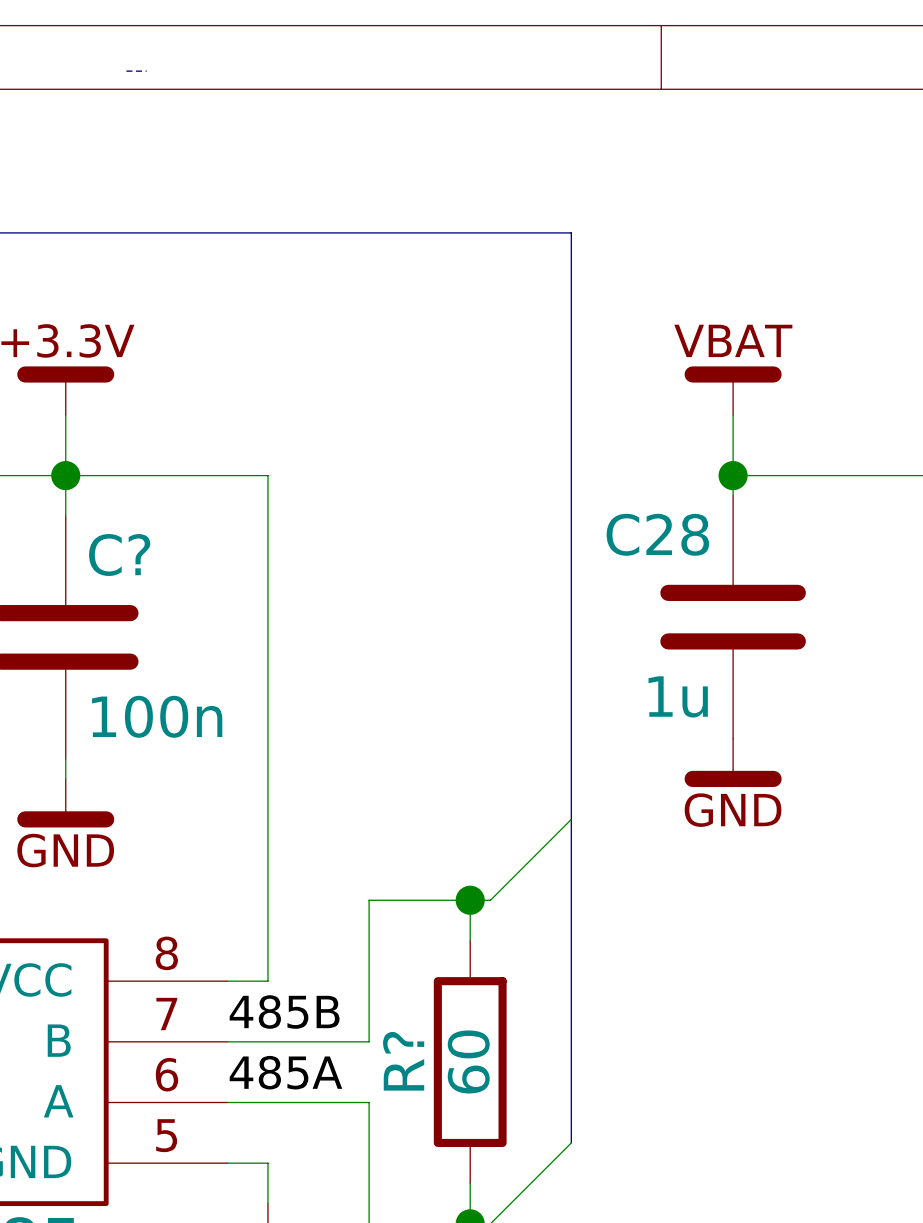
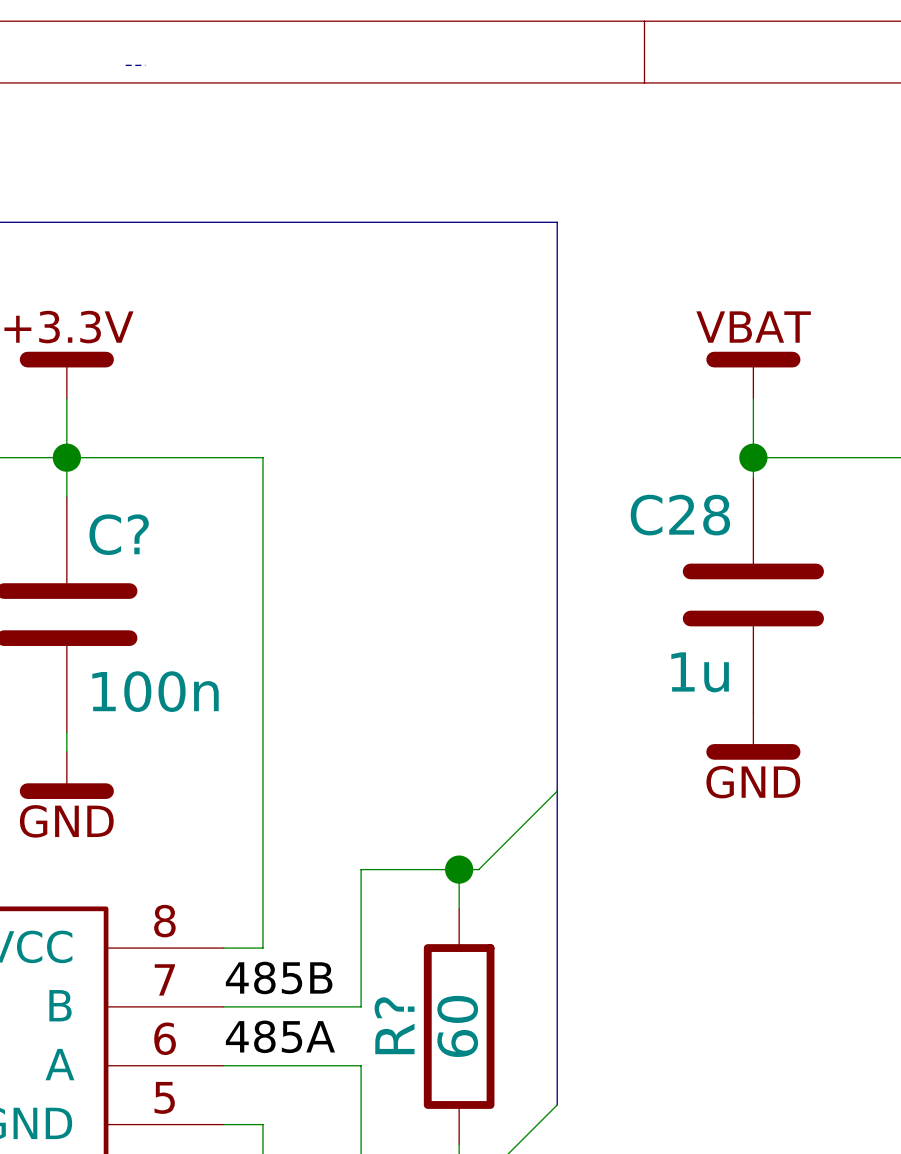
power symbol position: (733, 390) -> (753, 375)
wire: (733, 414) (733, 495) -> (753, 398) (753, 477)
wire: (733, 475) (773, 475) -> none
junction position: (733, 475) -> (753, 457)
C28 position: (733, 617) -> (753, 594)
power symbol position: (733, 762) -> (753, 736)

